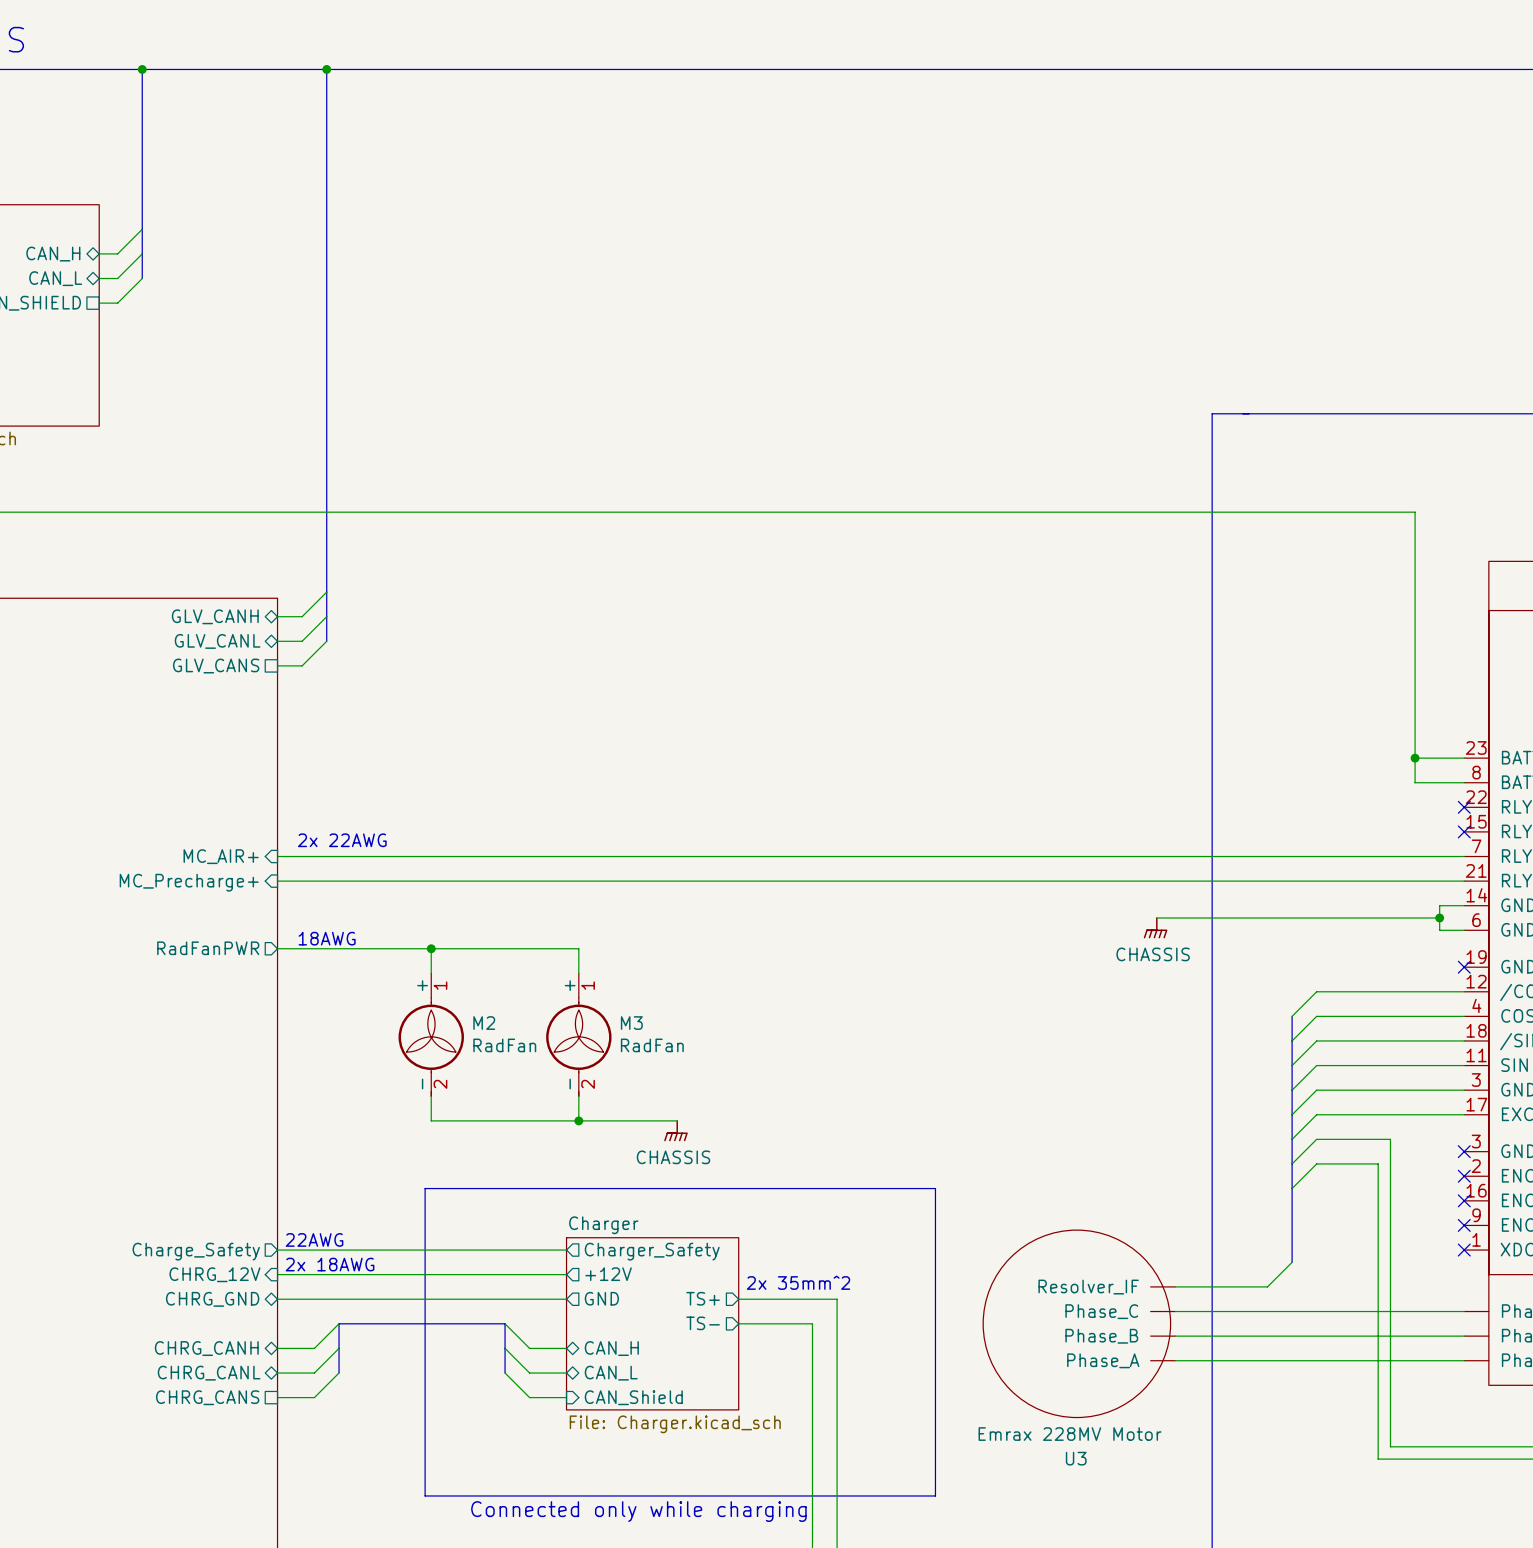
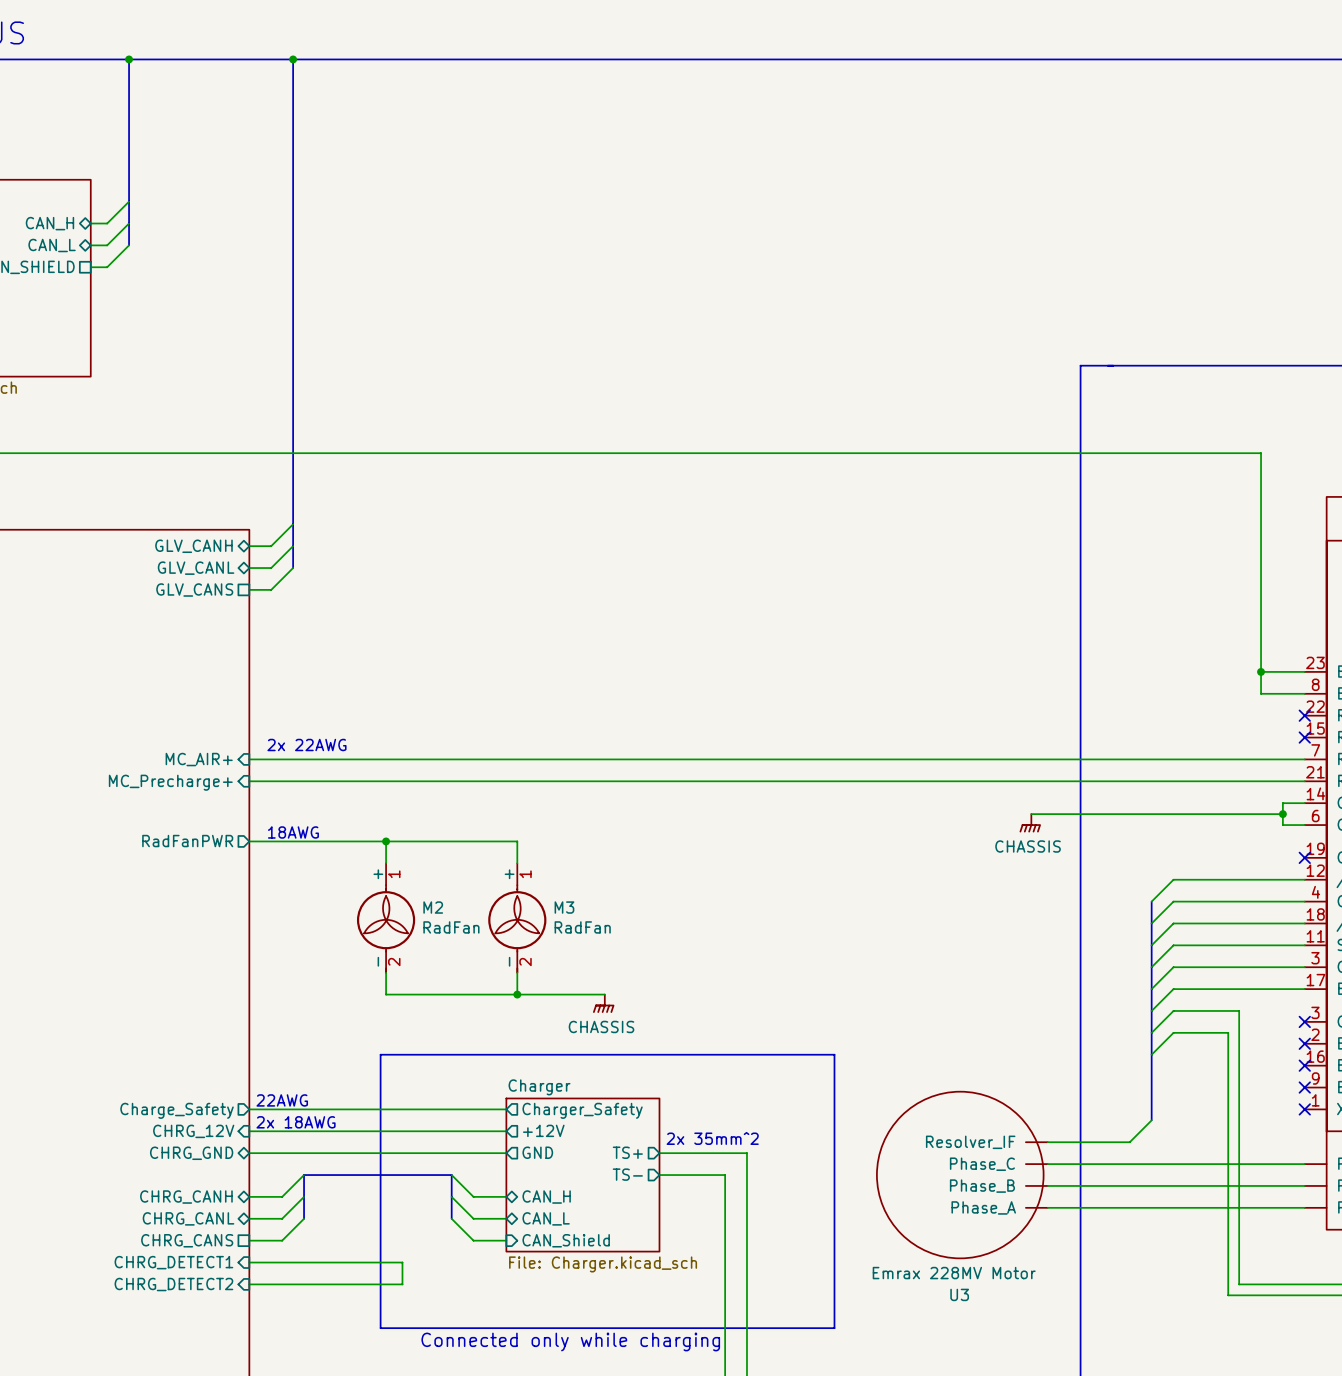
sheet pin: none -> CHRG_DETECT1 (173, 1262)
wire: none -> (249, 1262) (402, 1262) (402, 1284) (249, 1284)
sheet pin: none -> CHRG_DETECT2 (173, 1284)

